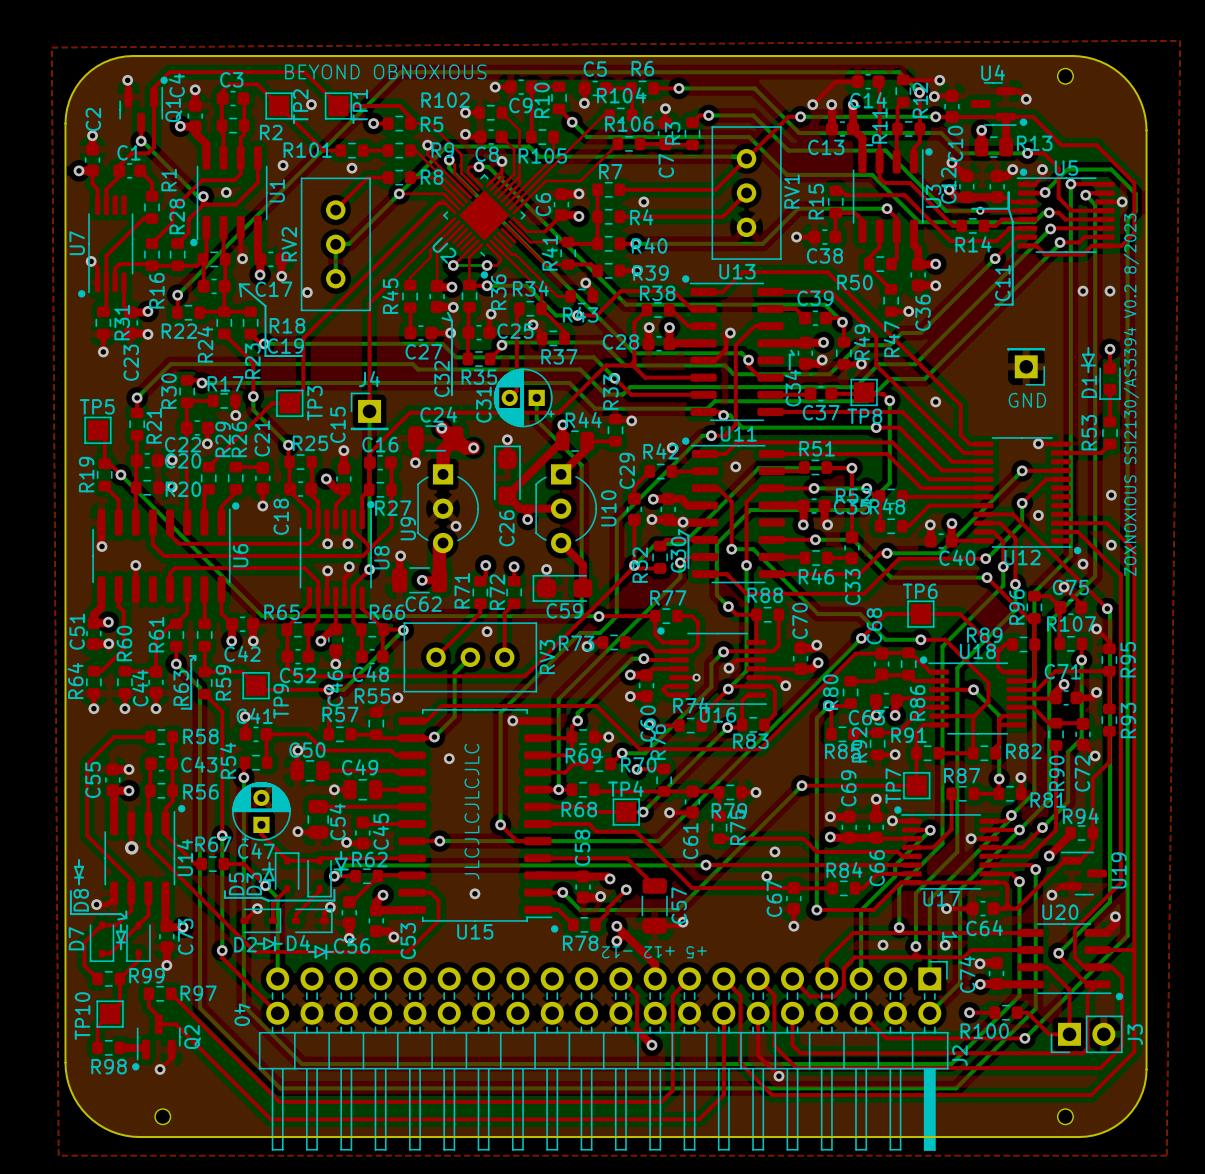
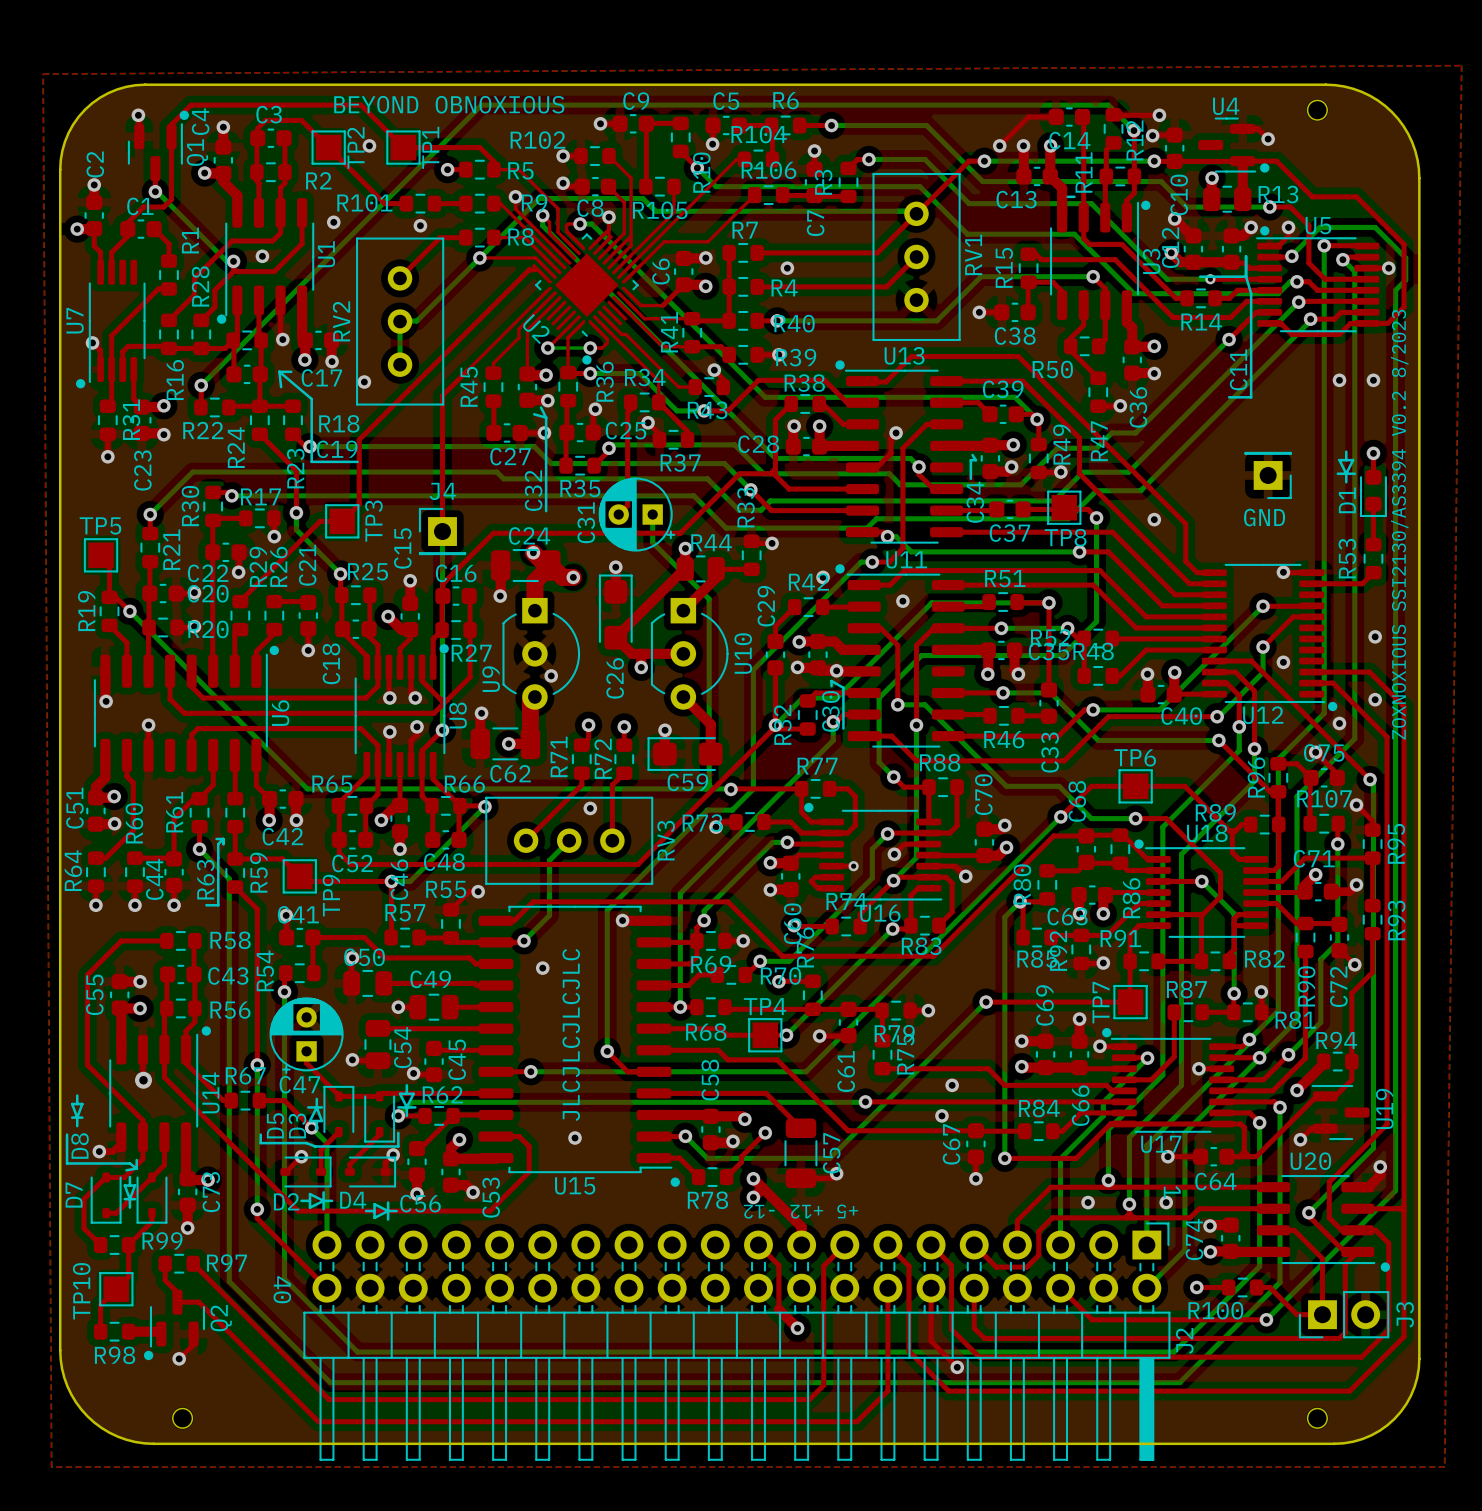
R10 name position: R10 (542, 100) -> R10 (701, 172)
C9 name position: C9 (520, 105) -> C9 (636, 101)

